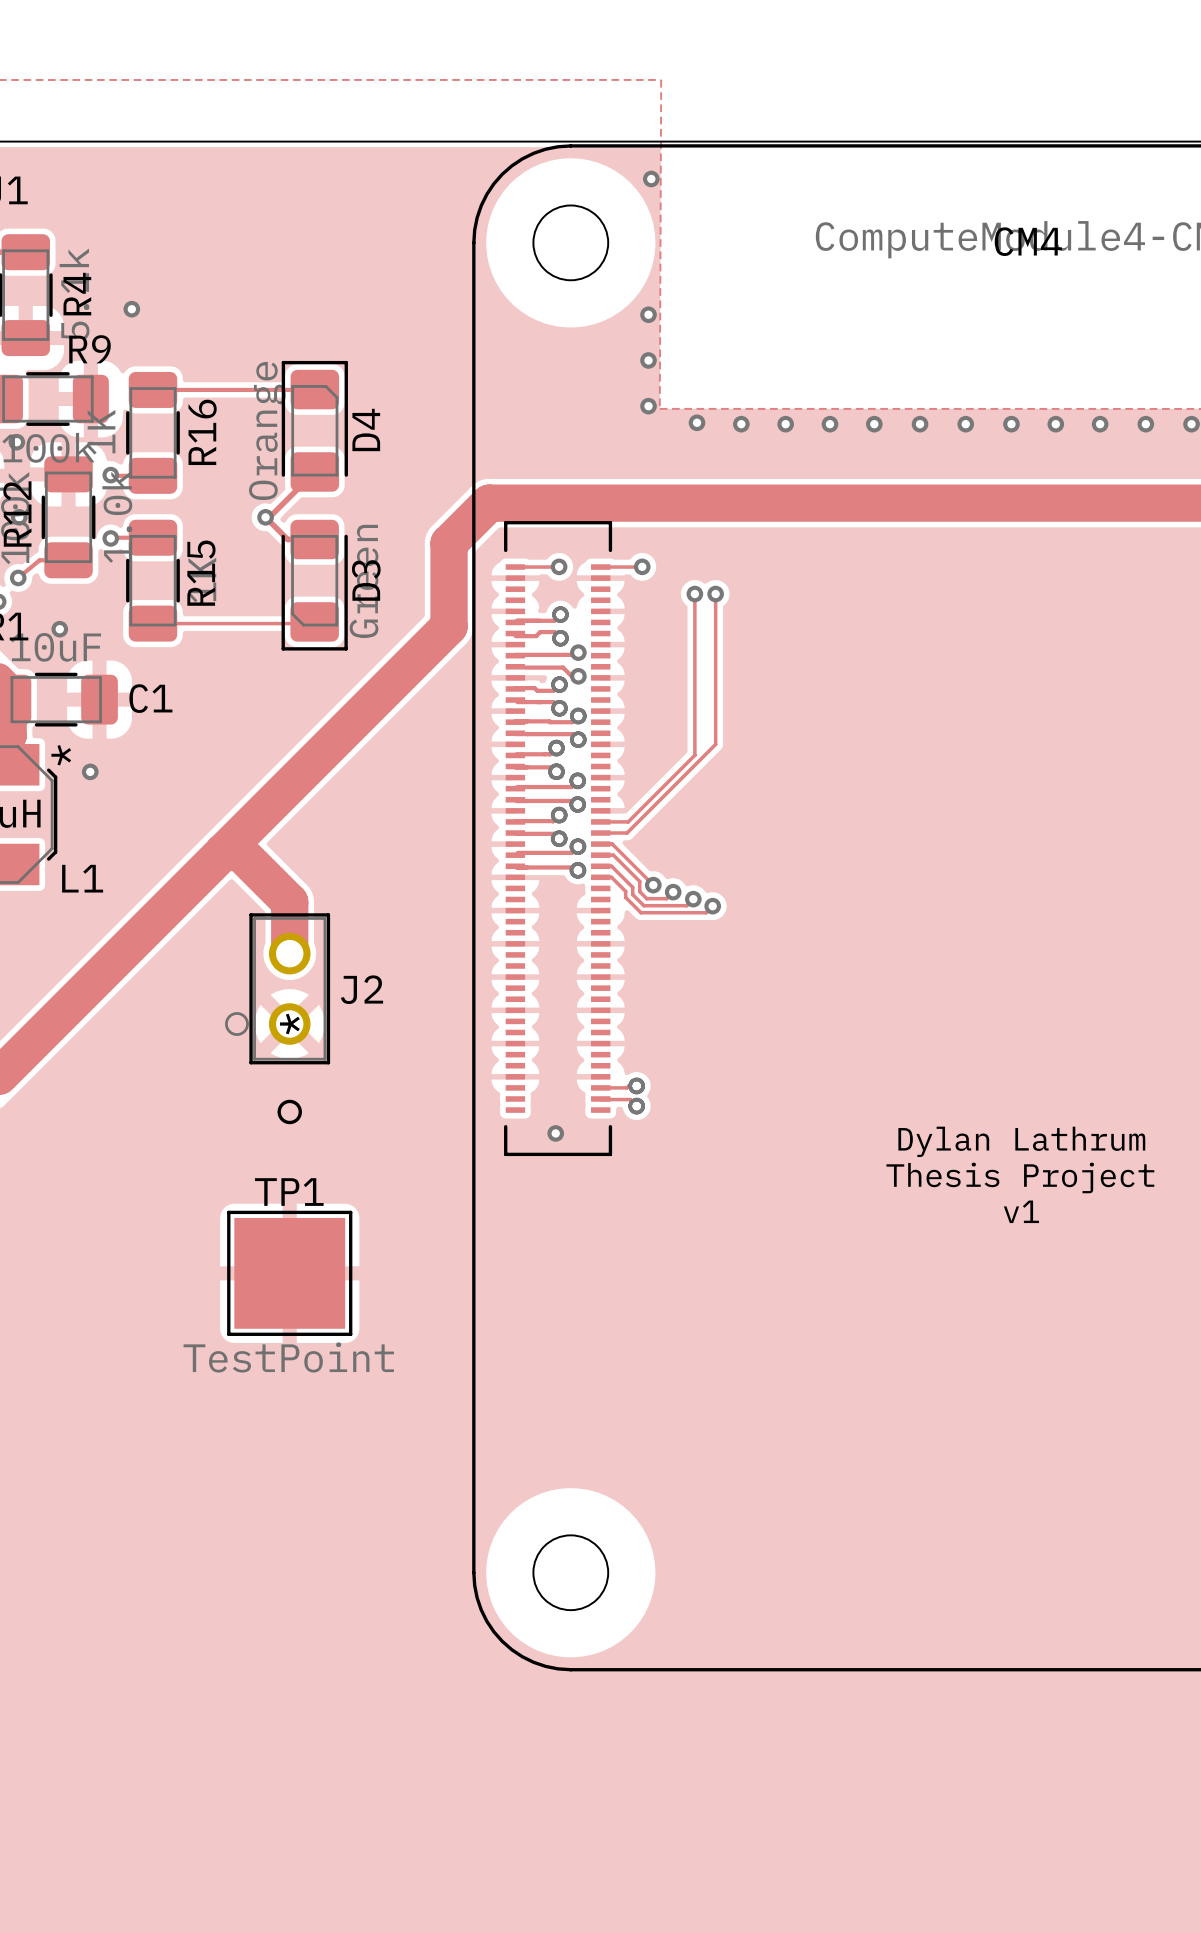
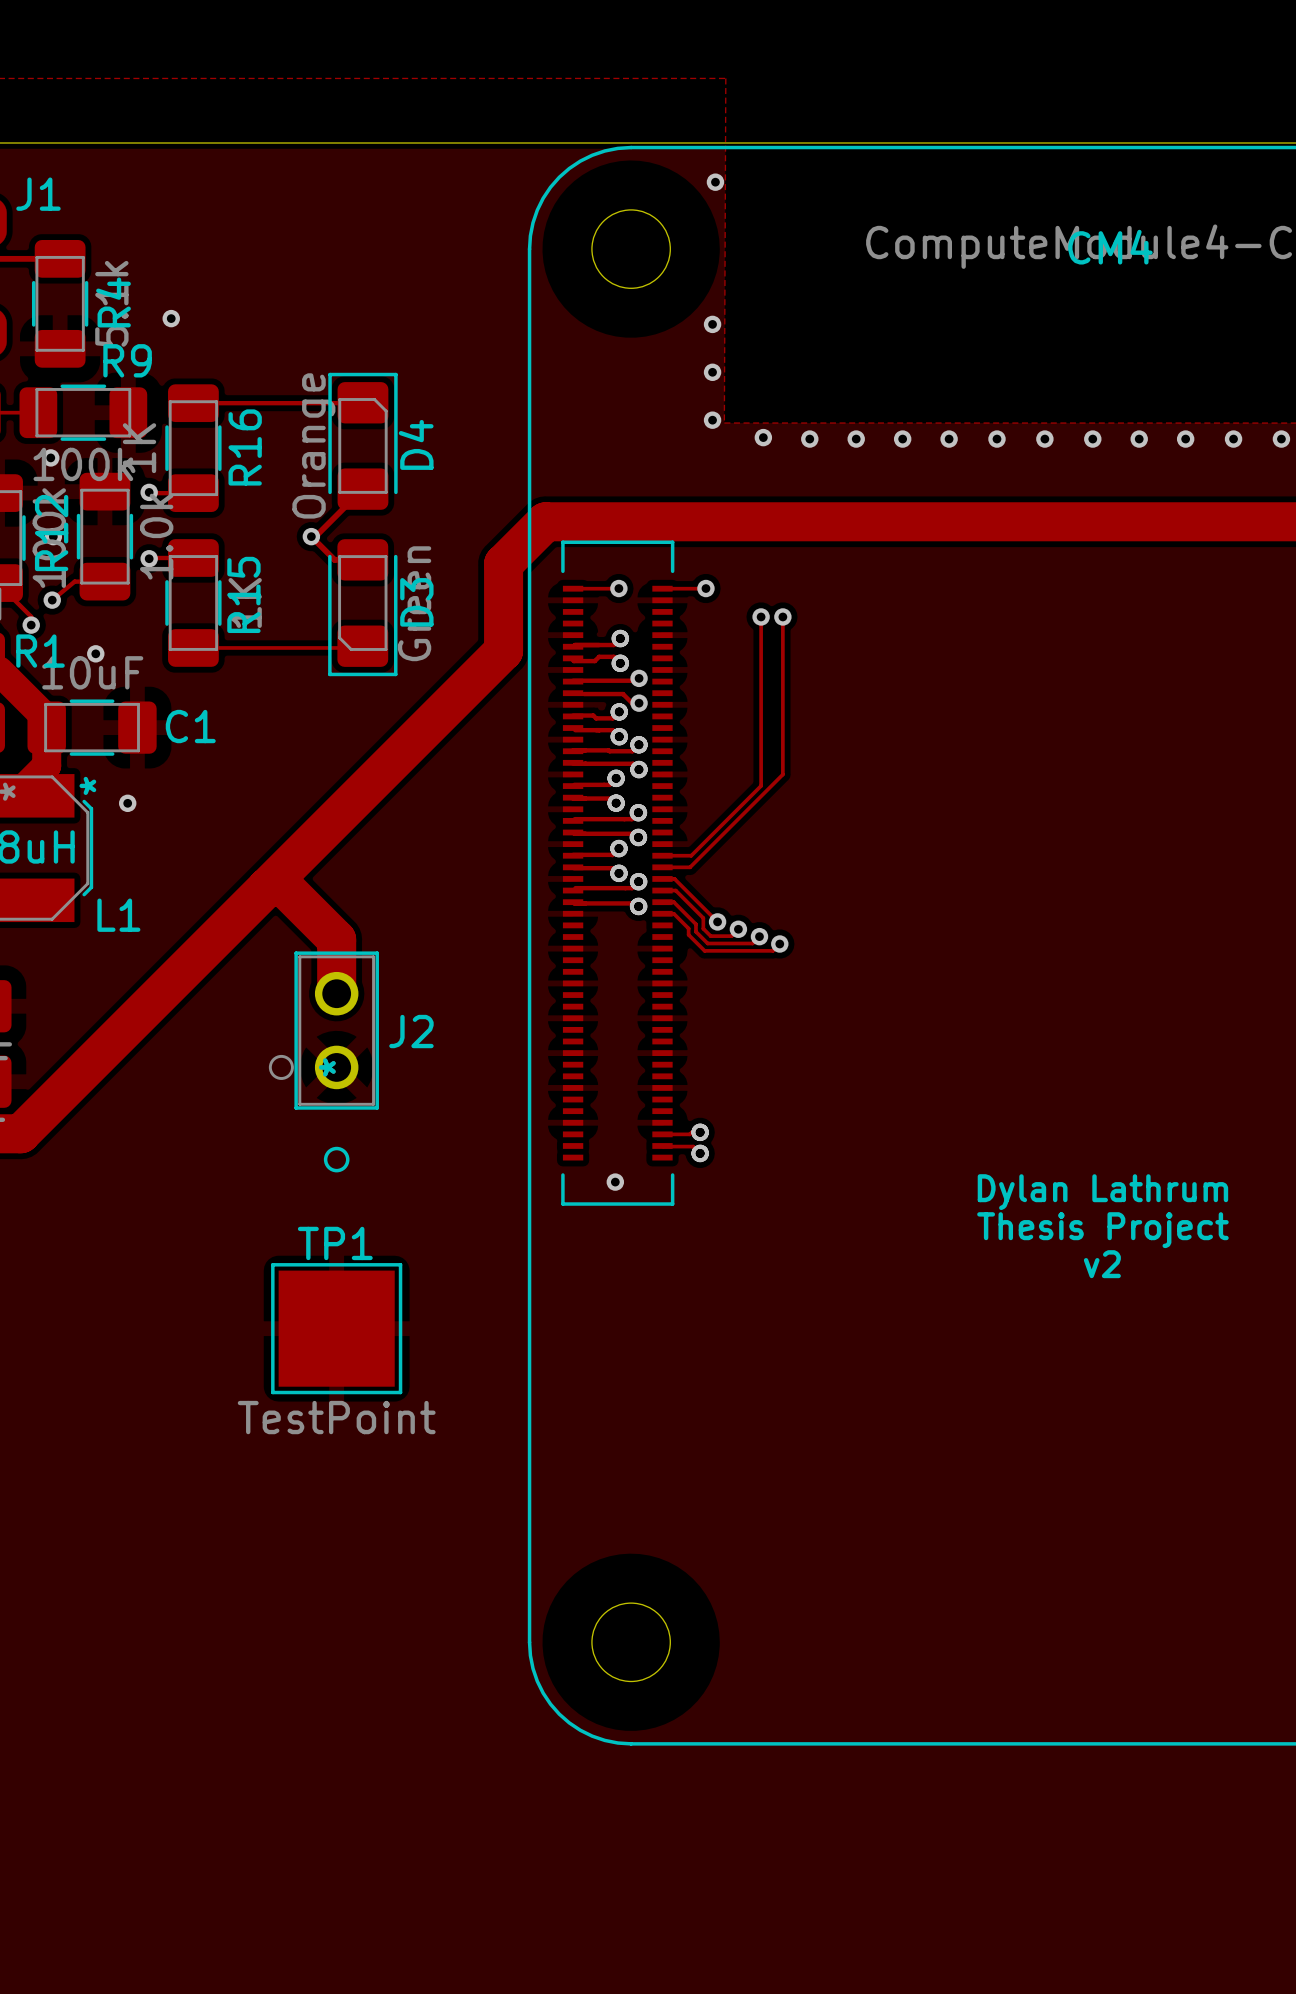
text: v1 (1021, 1211) -> v2 (1102, 1264)

